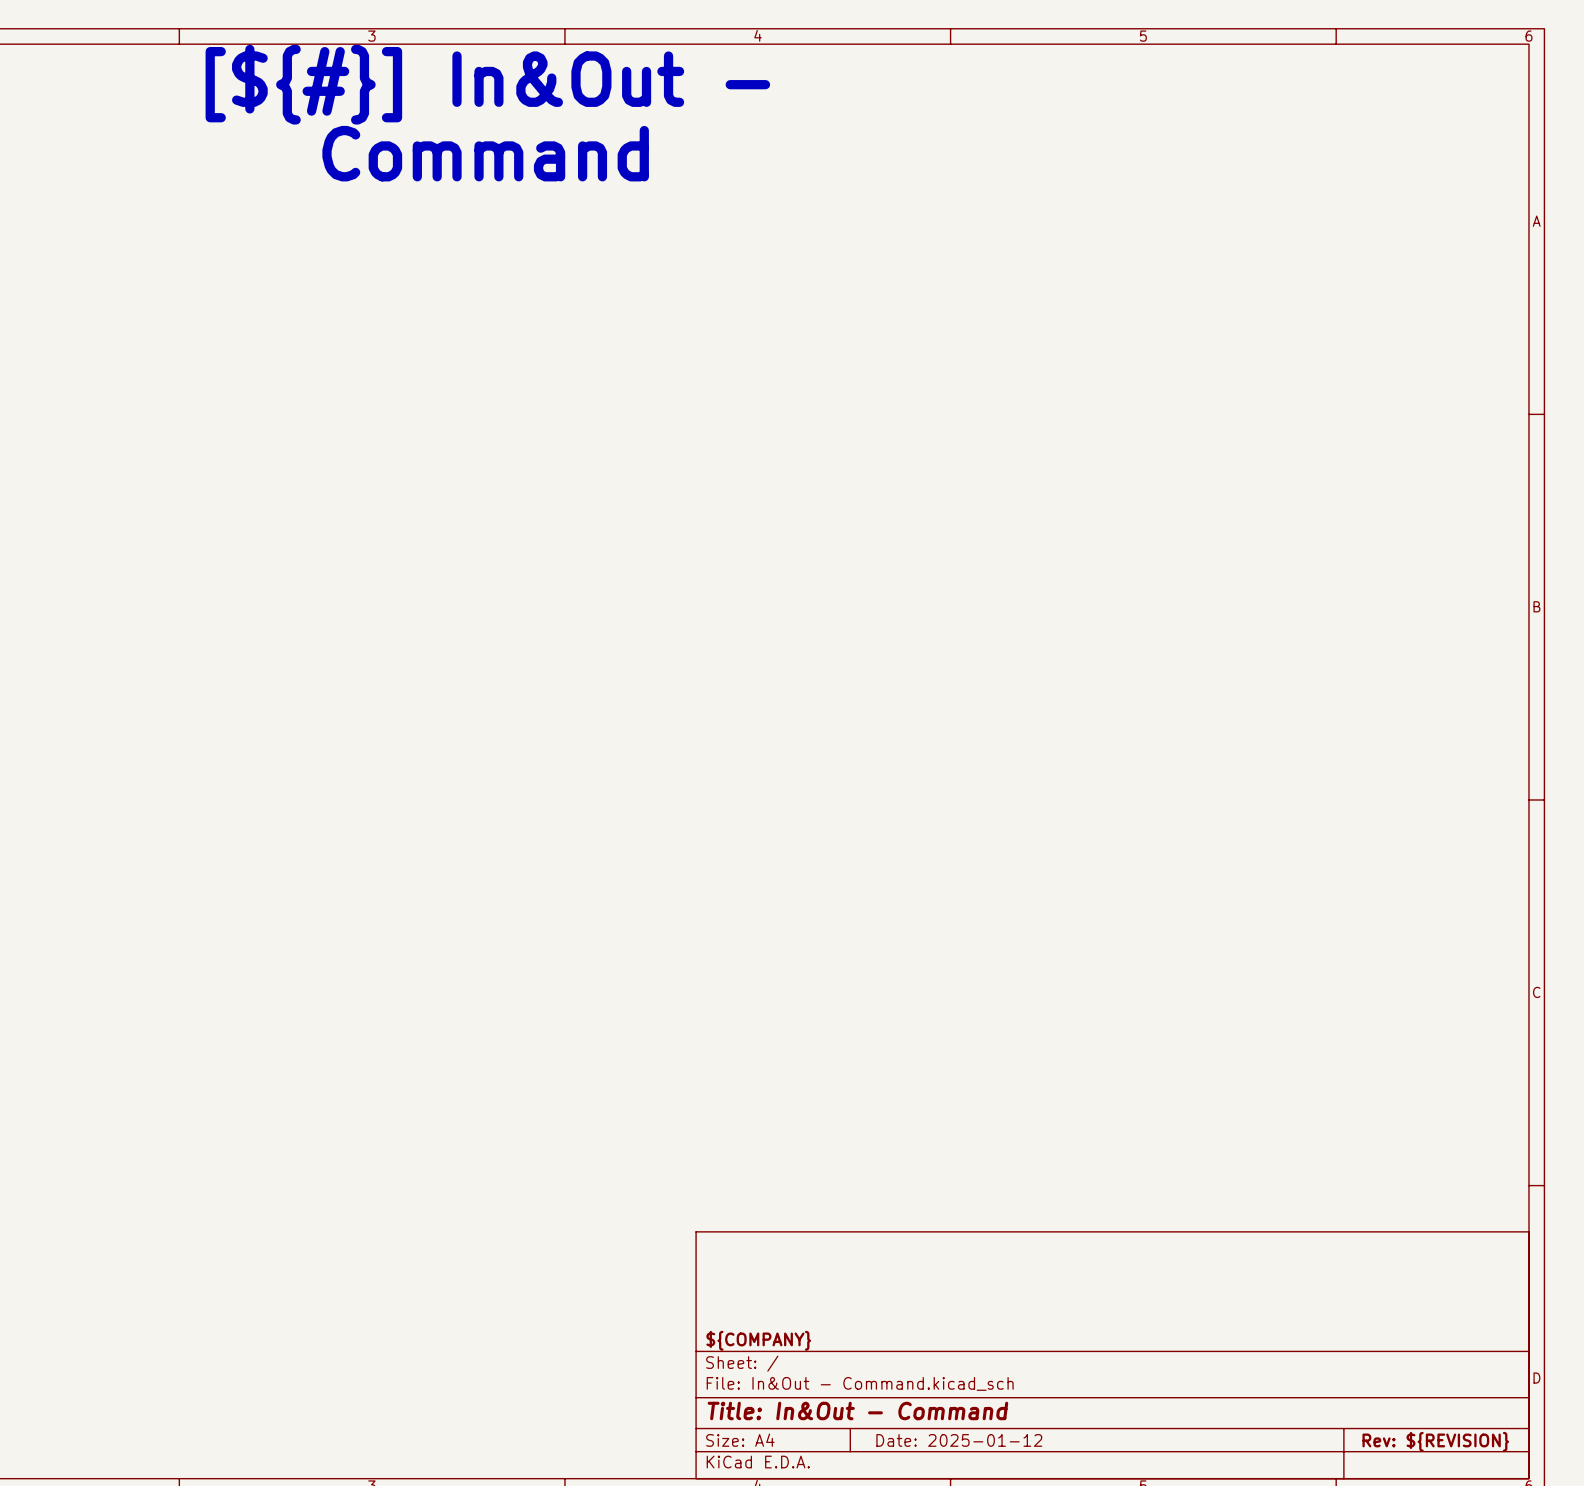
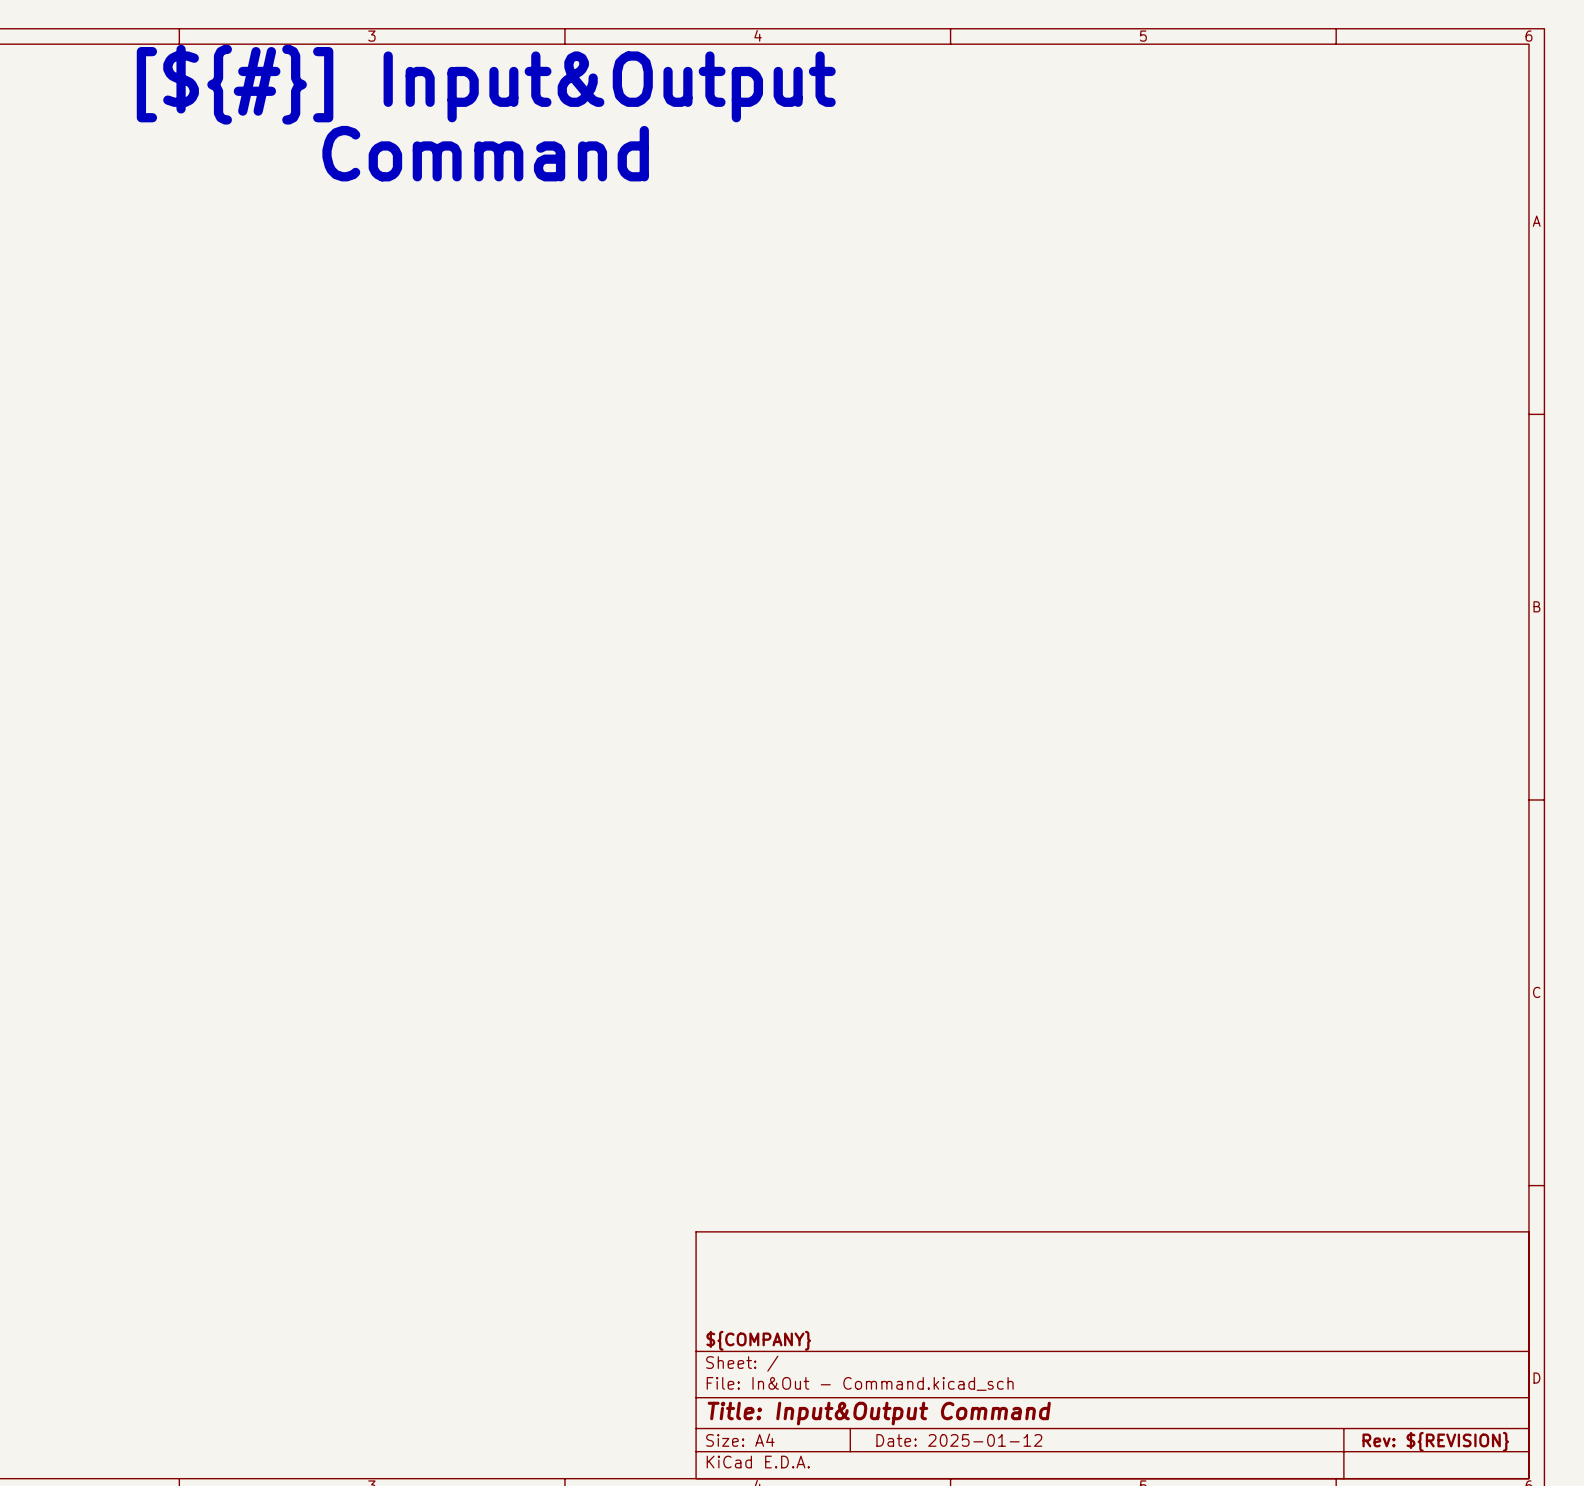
text: [${#}] In&Out - (487, 84) -> [${#}] Input&Output (486, 84)
title block: Title: In&Out - Command (857, 1410) -> Title: Input&Output Command (879, 1413)

